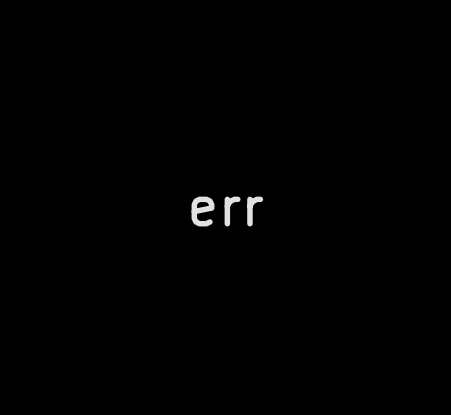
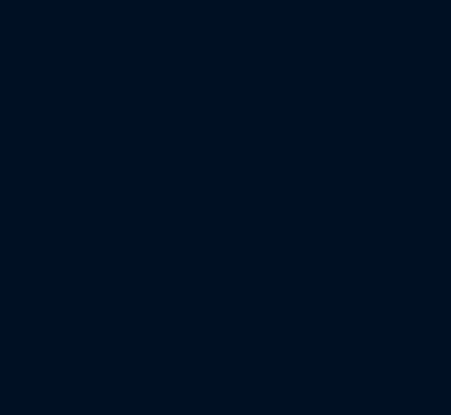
text: err (227, 211) -> none

